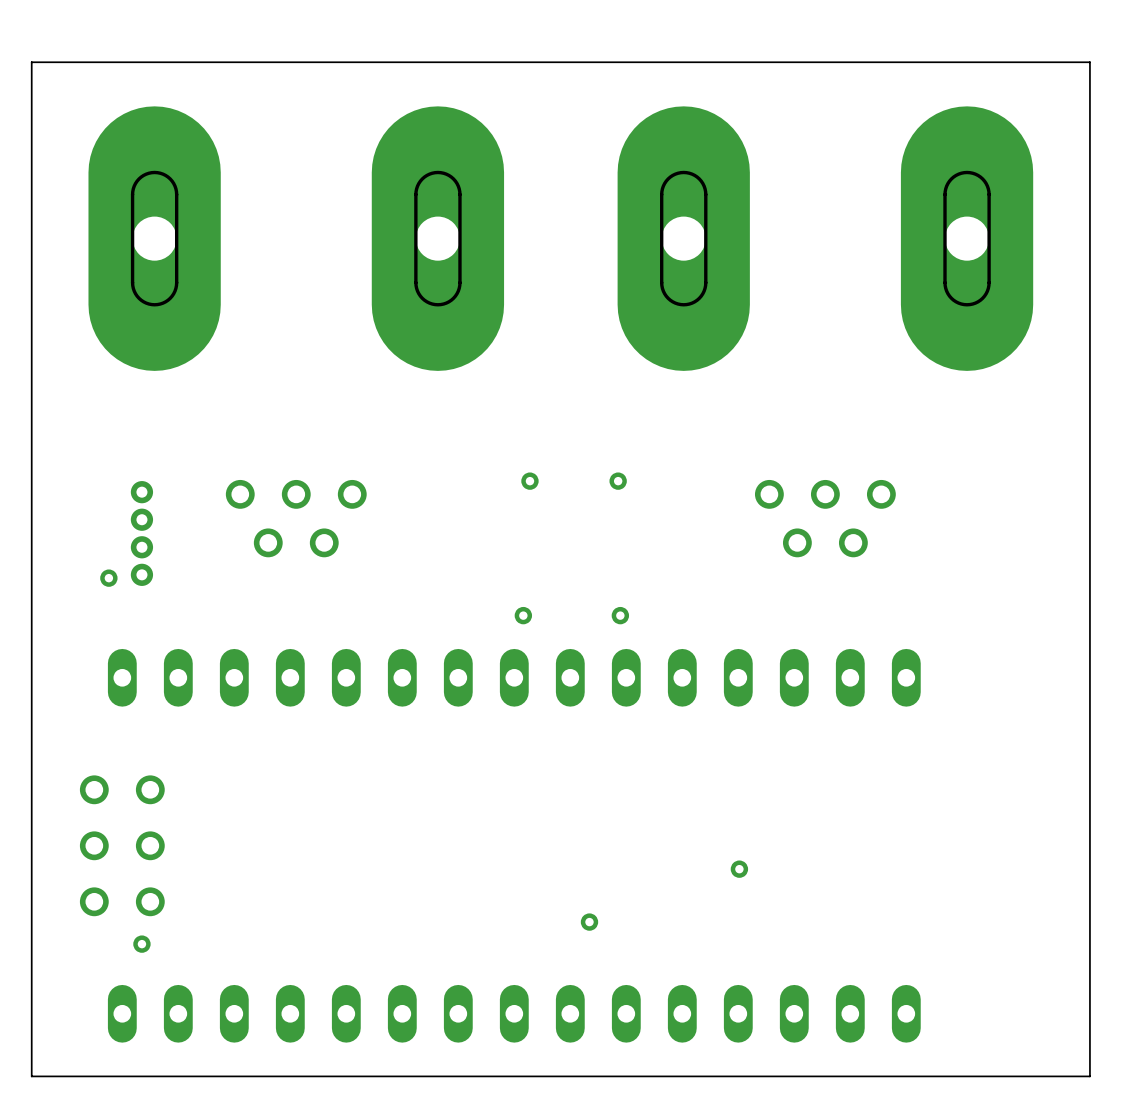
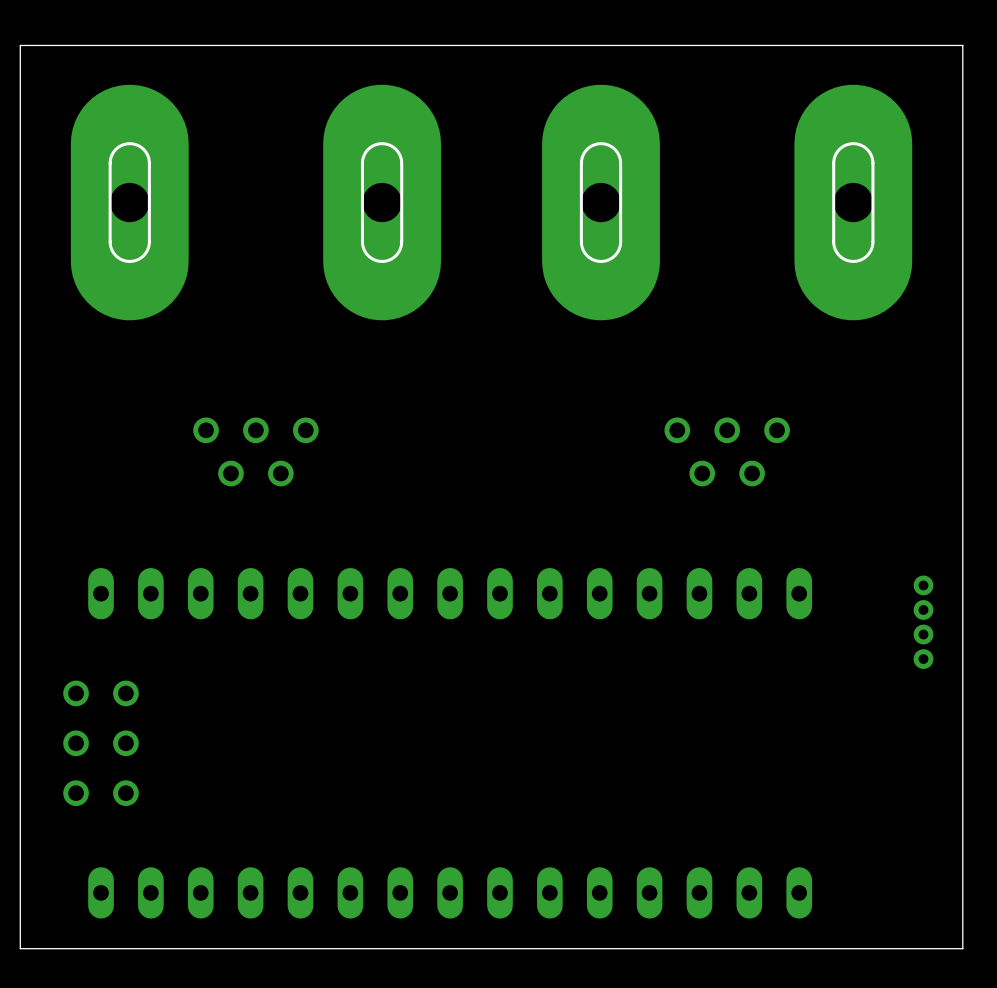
via: (529, 481) -> none
via: (618, 481) -> none
part: (141, 533) -> none
via: (108, 578) -> none
via: (523, 615) -> none
via: (620, 615) -> none
part: none -> (923, 622)
via: (739, 869) -> none
via: (589, 922) -> none
via: (141, 944) -> none

